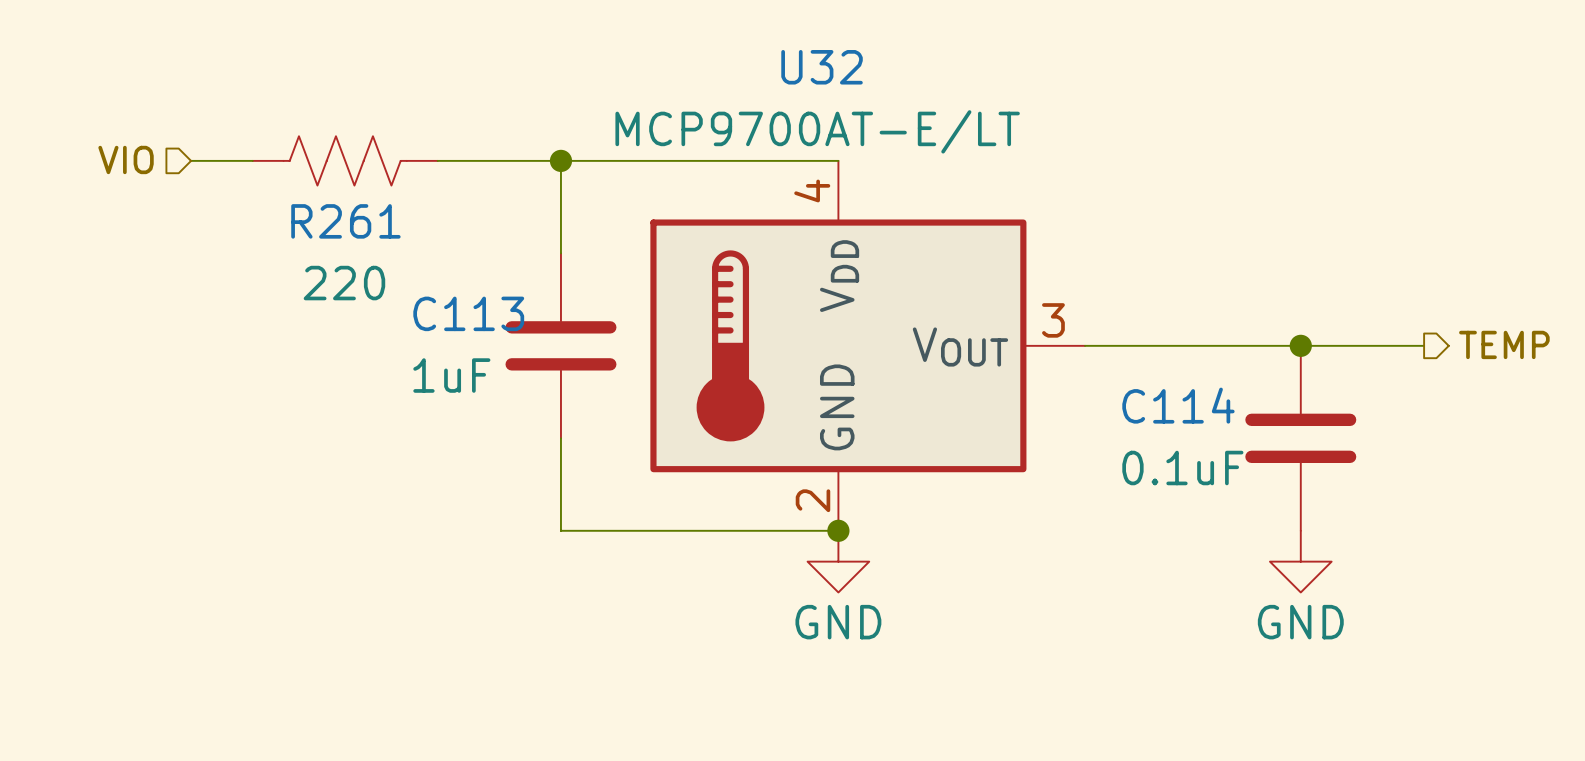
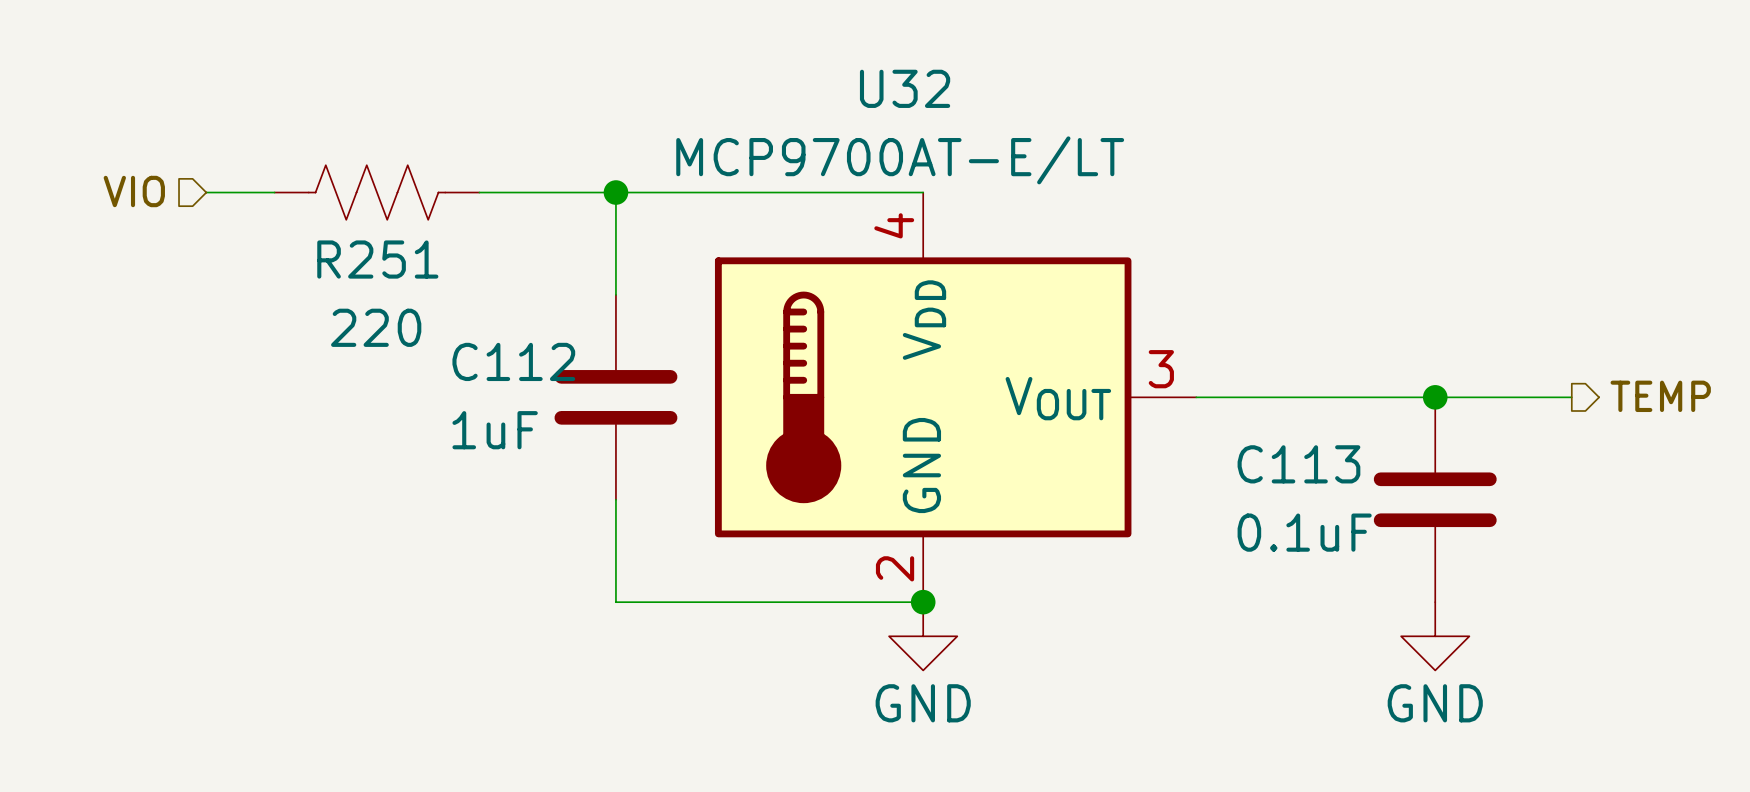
R261 name: R261 (345, 221) -> R251 (377, 259)
C113 name: C113 (468, 313) -> C112 (513, 361)
C114 name: C114 (1178, 405) -> C113 (1298, 464)

